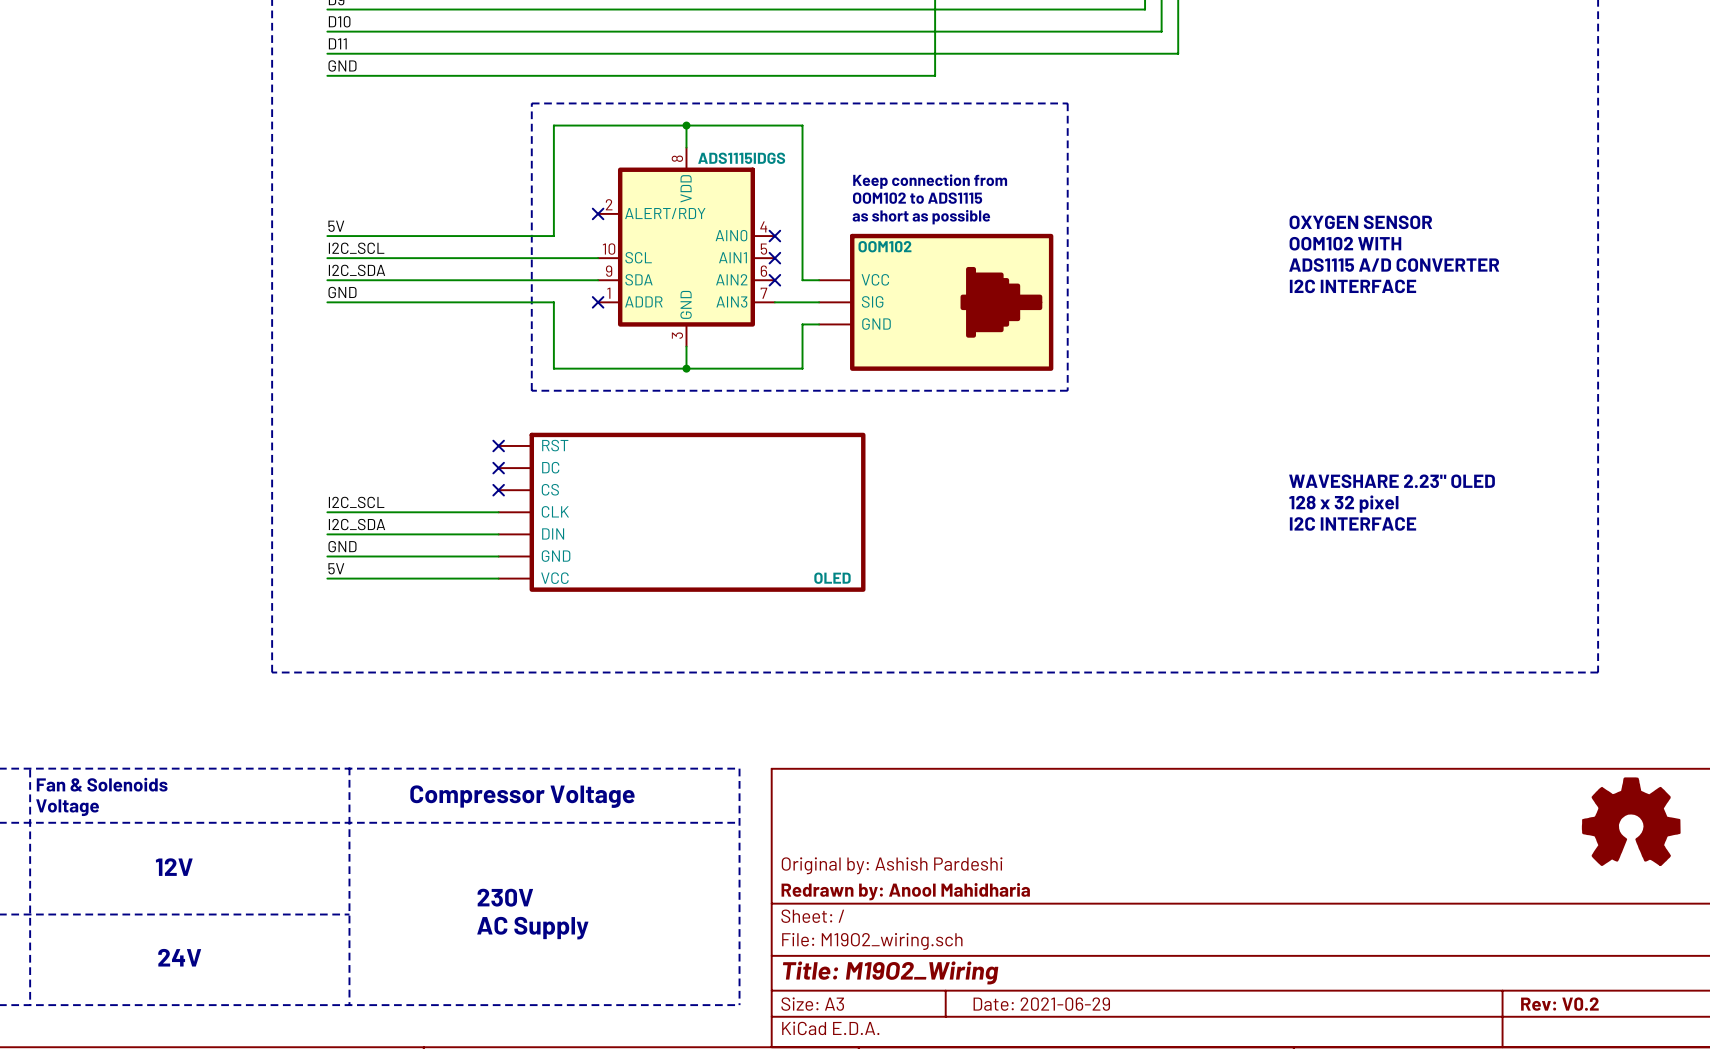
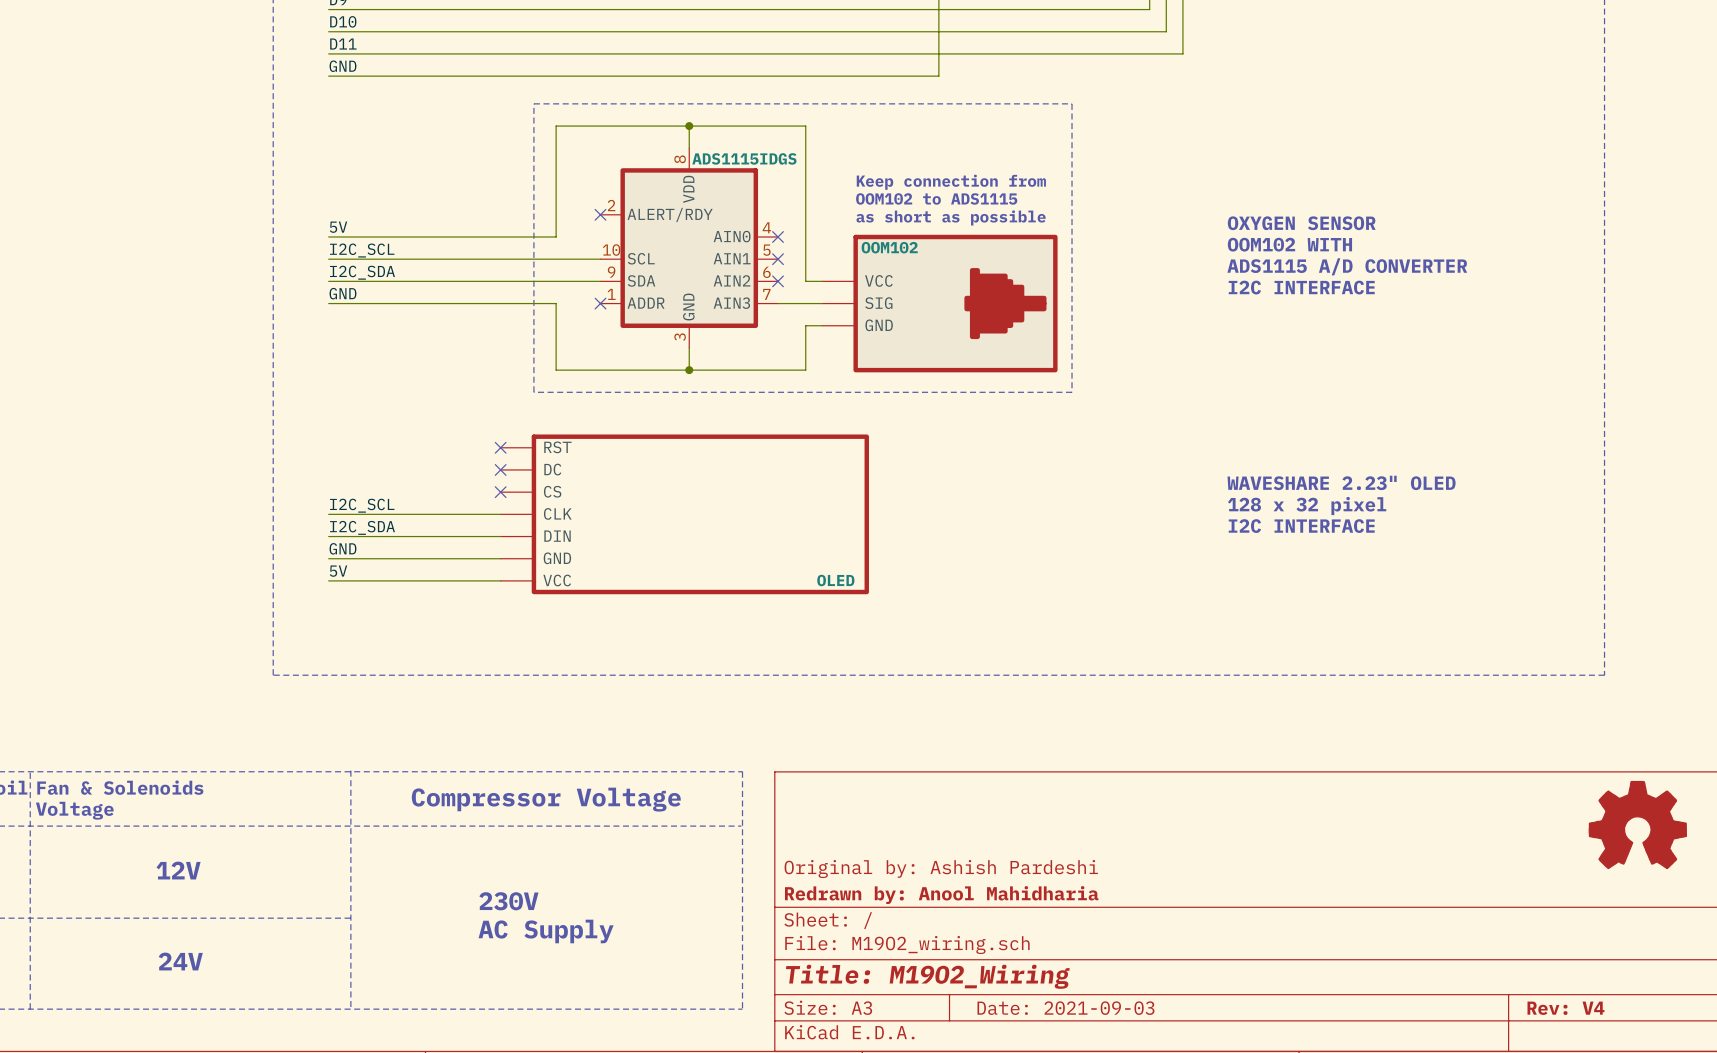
text position: OXYGEN SENSOR (1360, 222) -> OXYGEN SENSOR (1301, 223)
text position: OOM102 WITH (1345, 243) -> OOM102 WITH (1289, 244)
text position: ADS1115 A/D CONVERTER (1394, 265) -> ADS1115 A/D CONVERTER (1347, 266)
text position: I2C INTERFACE (1353, 286) -> I2C INTERFACE (1301, 287)
text position: WAVESHARE 2.23" OLED (1392, 481) -> WAVESHARE 2.23" OLED (1341, 482)
text position: 128 x 32 pixel (1343, 504) -> 128 x 32 pixel (1307, 506)
text position: I2C INTERFACE (1353, 523) -> I2C INTERFACE (1301, 526)
title block: Date: 2021-06-29 (1041, 1004) -> Date: 2021-09-03 (1065, 1008)
title block: Rev: V0.2 (1559, 1004) -> Rev: V4 (1565, 1008)

